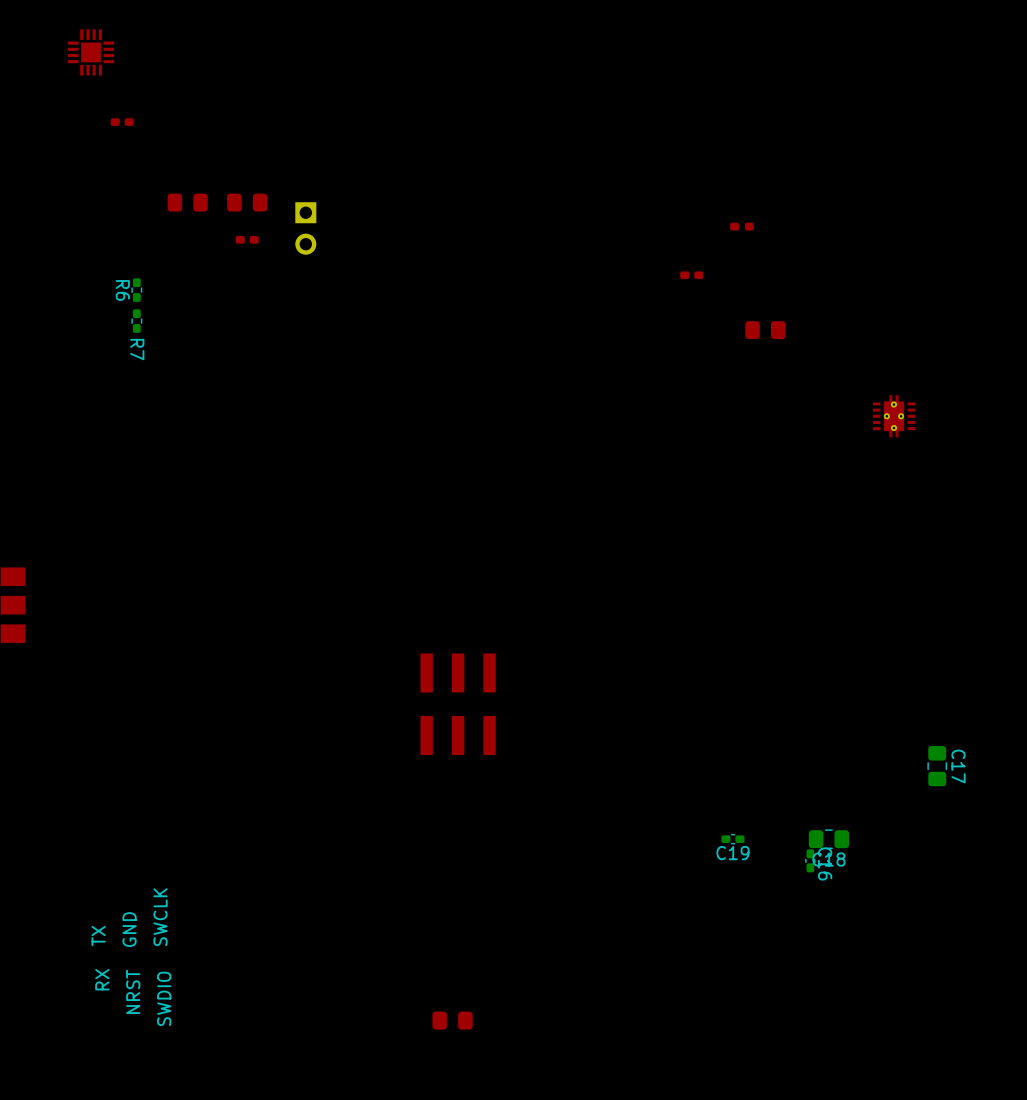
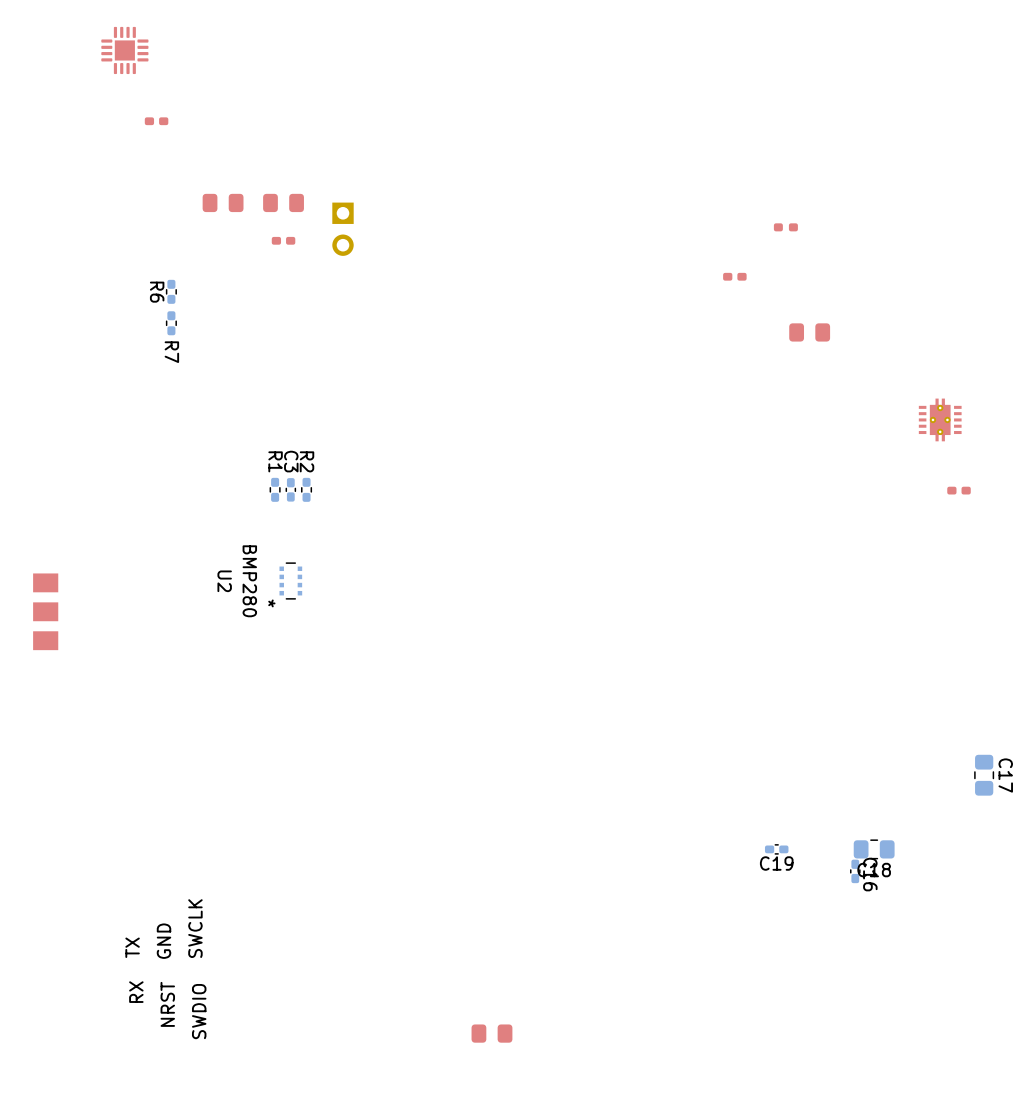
R1: none -> (275, 489)
C3: none -> (290, 489)
R2: none -> (306, 489)
part: none -> (959, 490)
U2: none -> BMP280 (290, 580)
part: (458, 704) -> none

